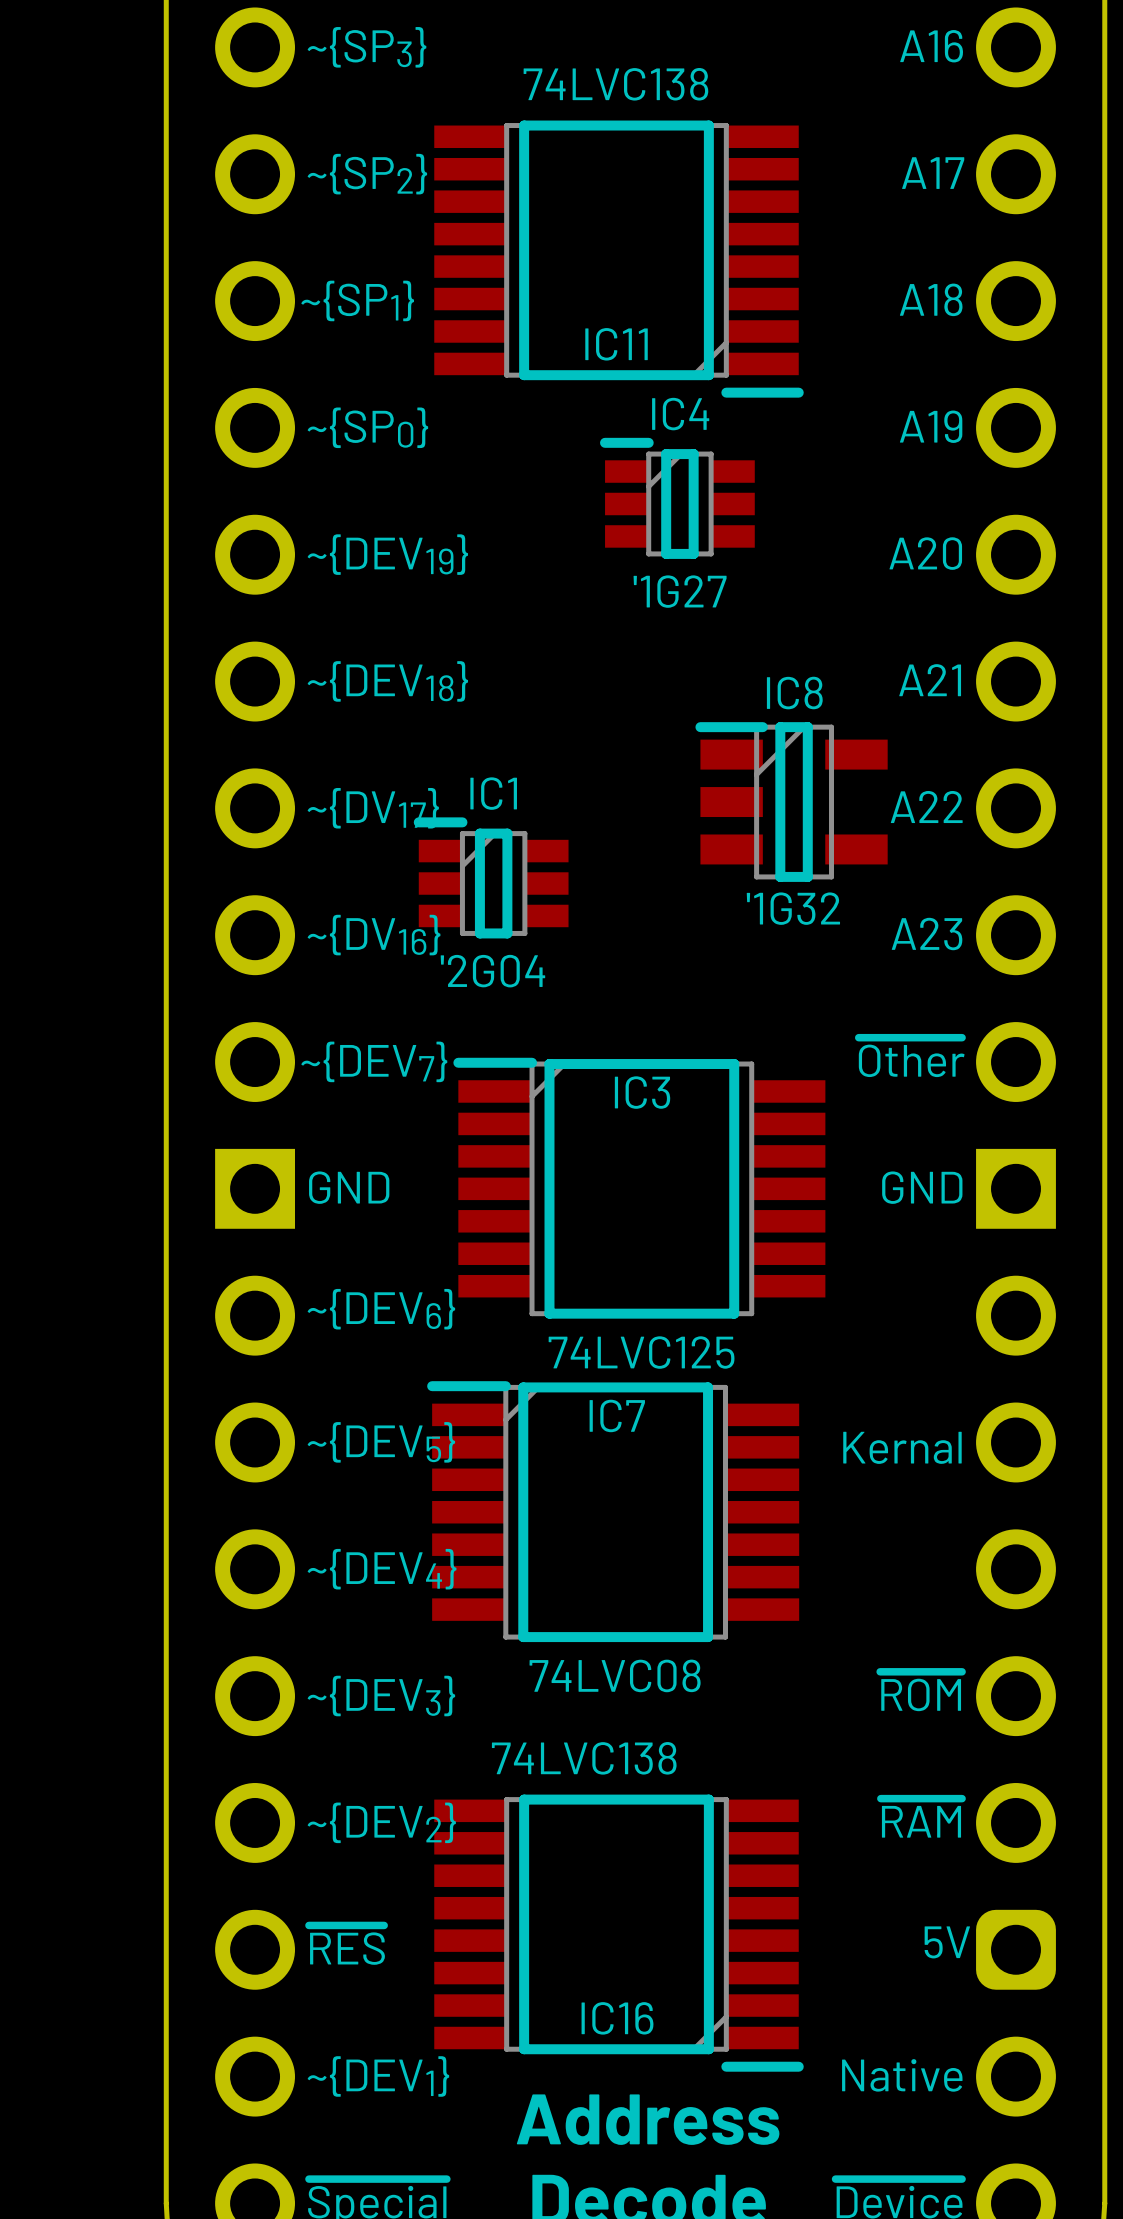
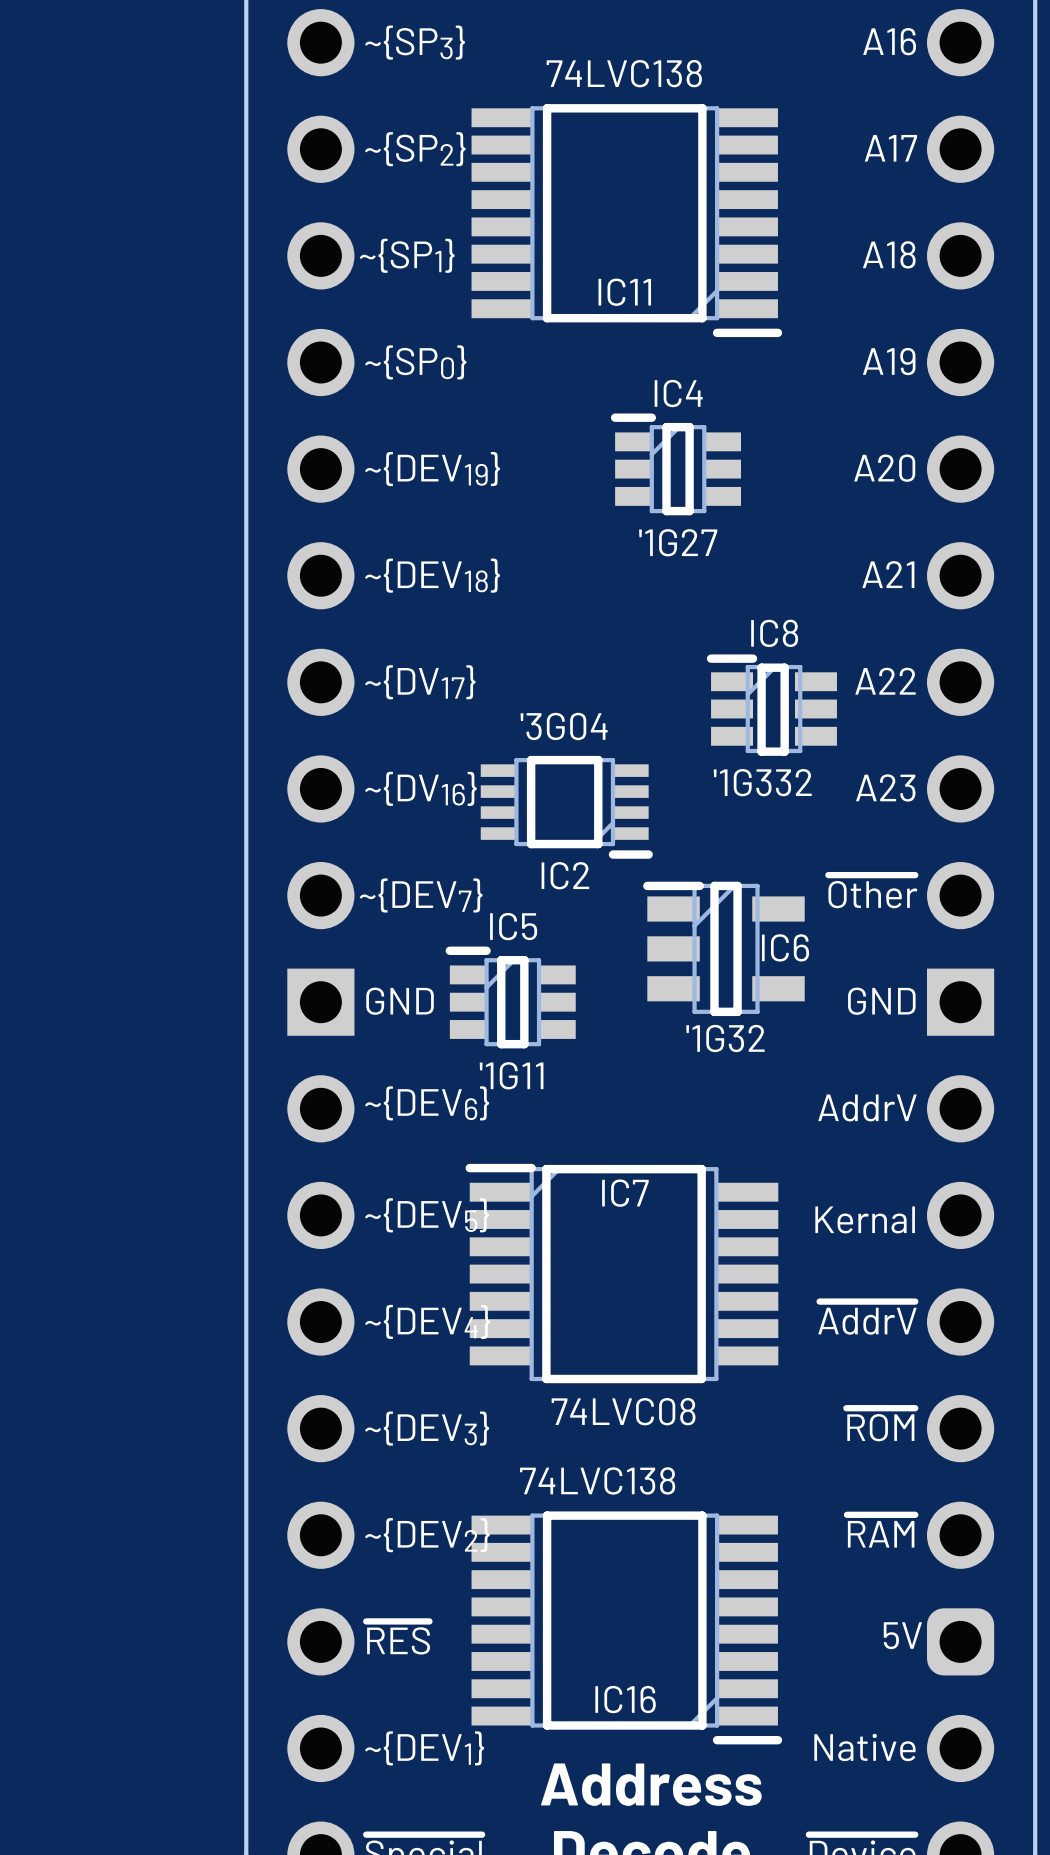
IC4 position: (677, 498) -> (675, 464)
IC8 footprint: [695, 722, 888, 882] -> [706, 654, 837, 756]
IC1: (491, 877) -> none
IC8 text: '1G32 (793, 908) -> none
IC2: none -> (566, 807)
IC6: none -> (723, 948)
IC5: none -> (510, 997)
IC3: (639, 1188) -> none
text: none -> AddrV (867, 1107)
text: none -> ~{AddrV} (867, 1318)

